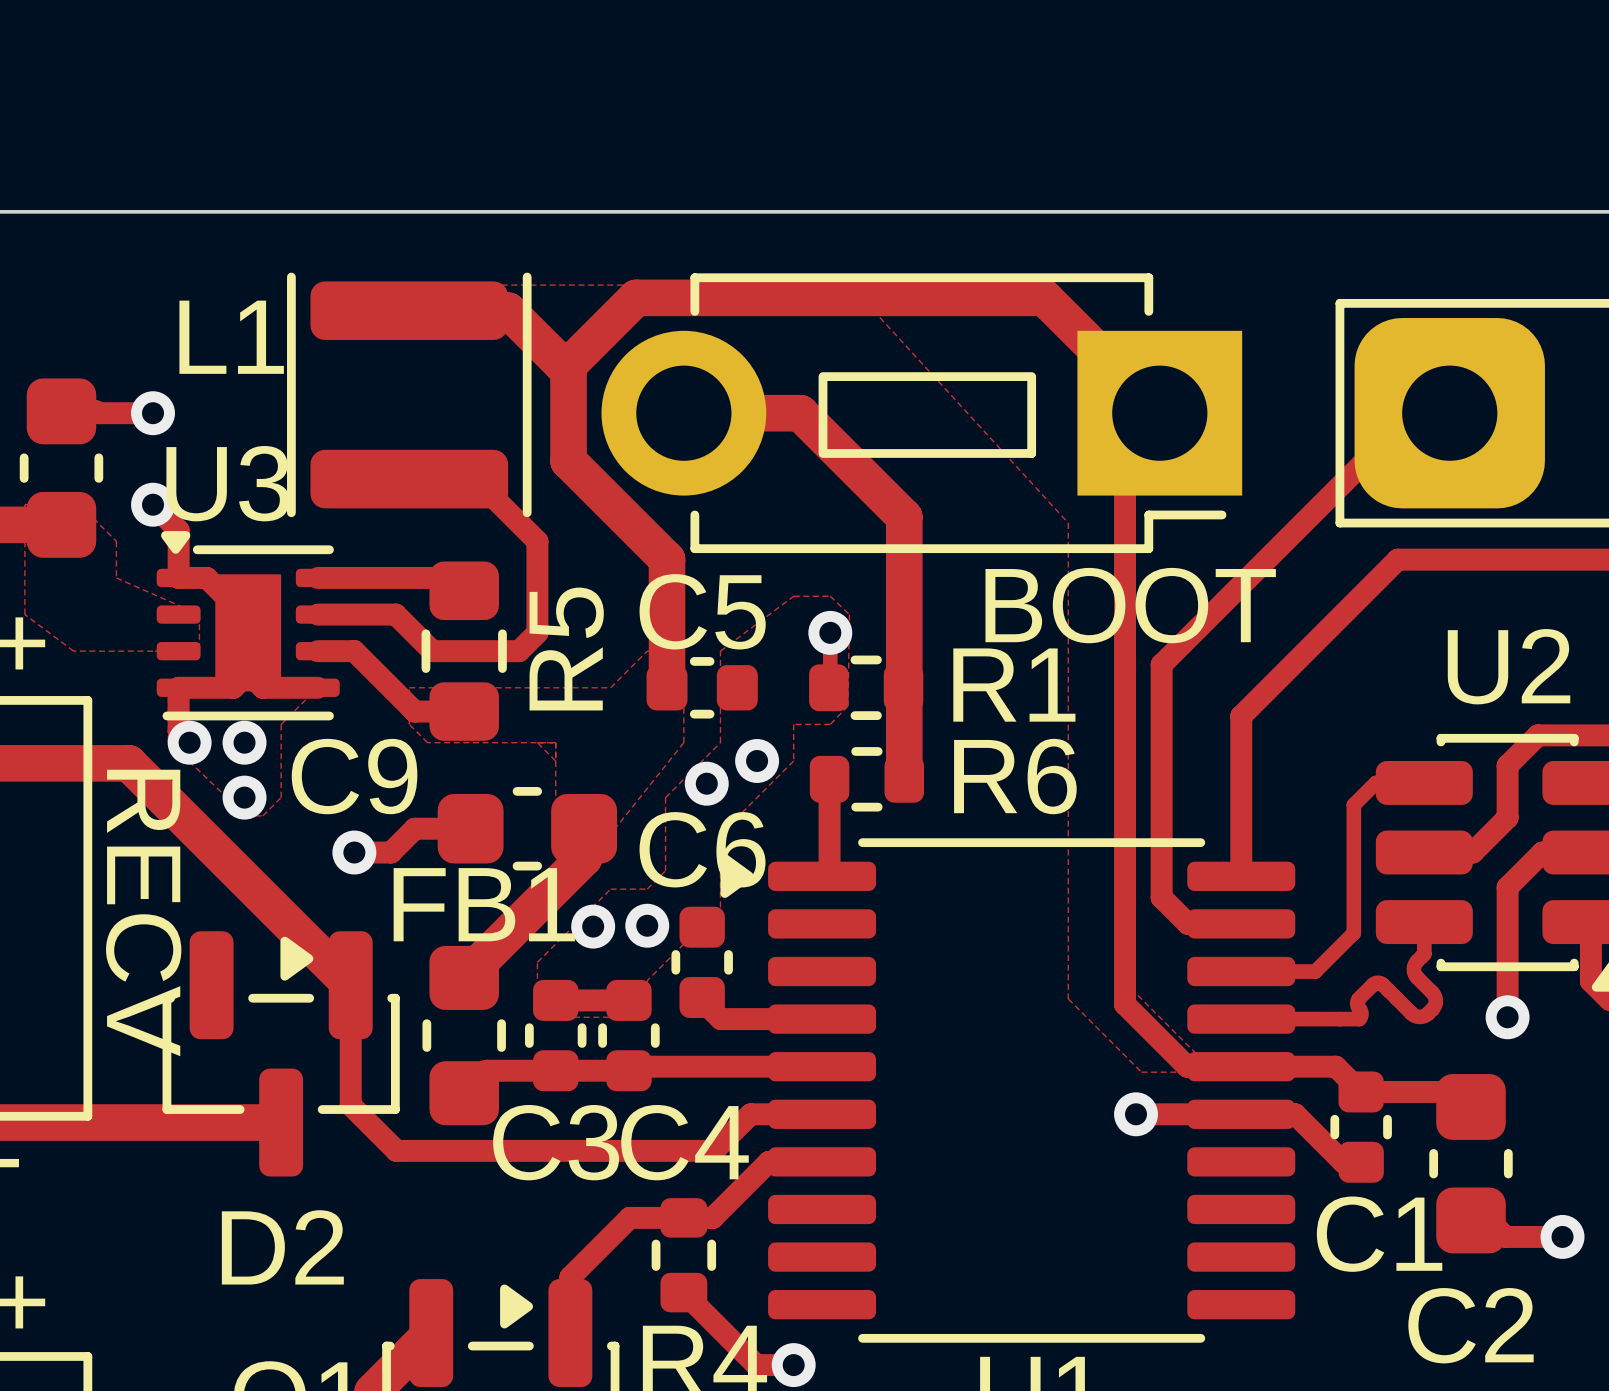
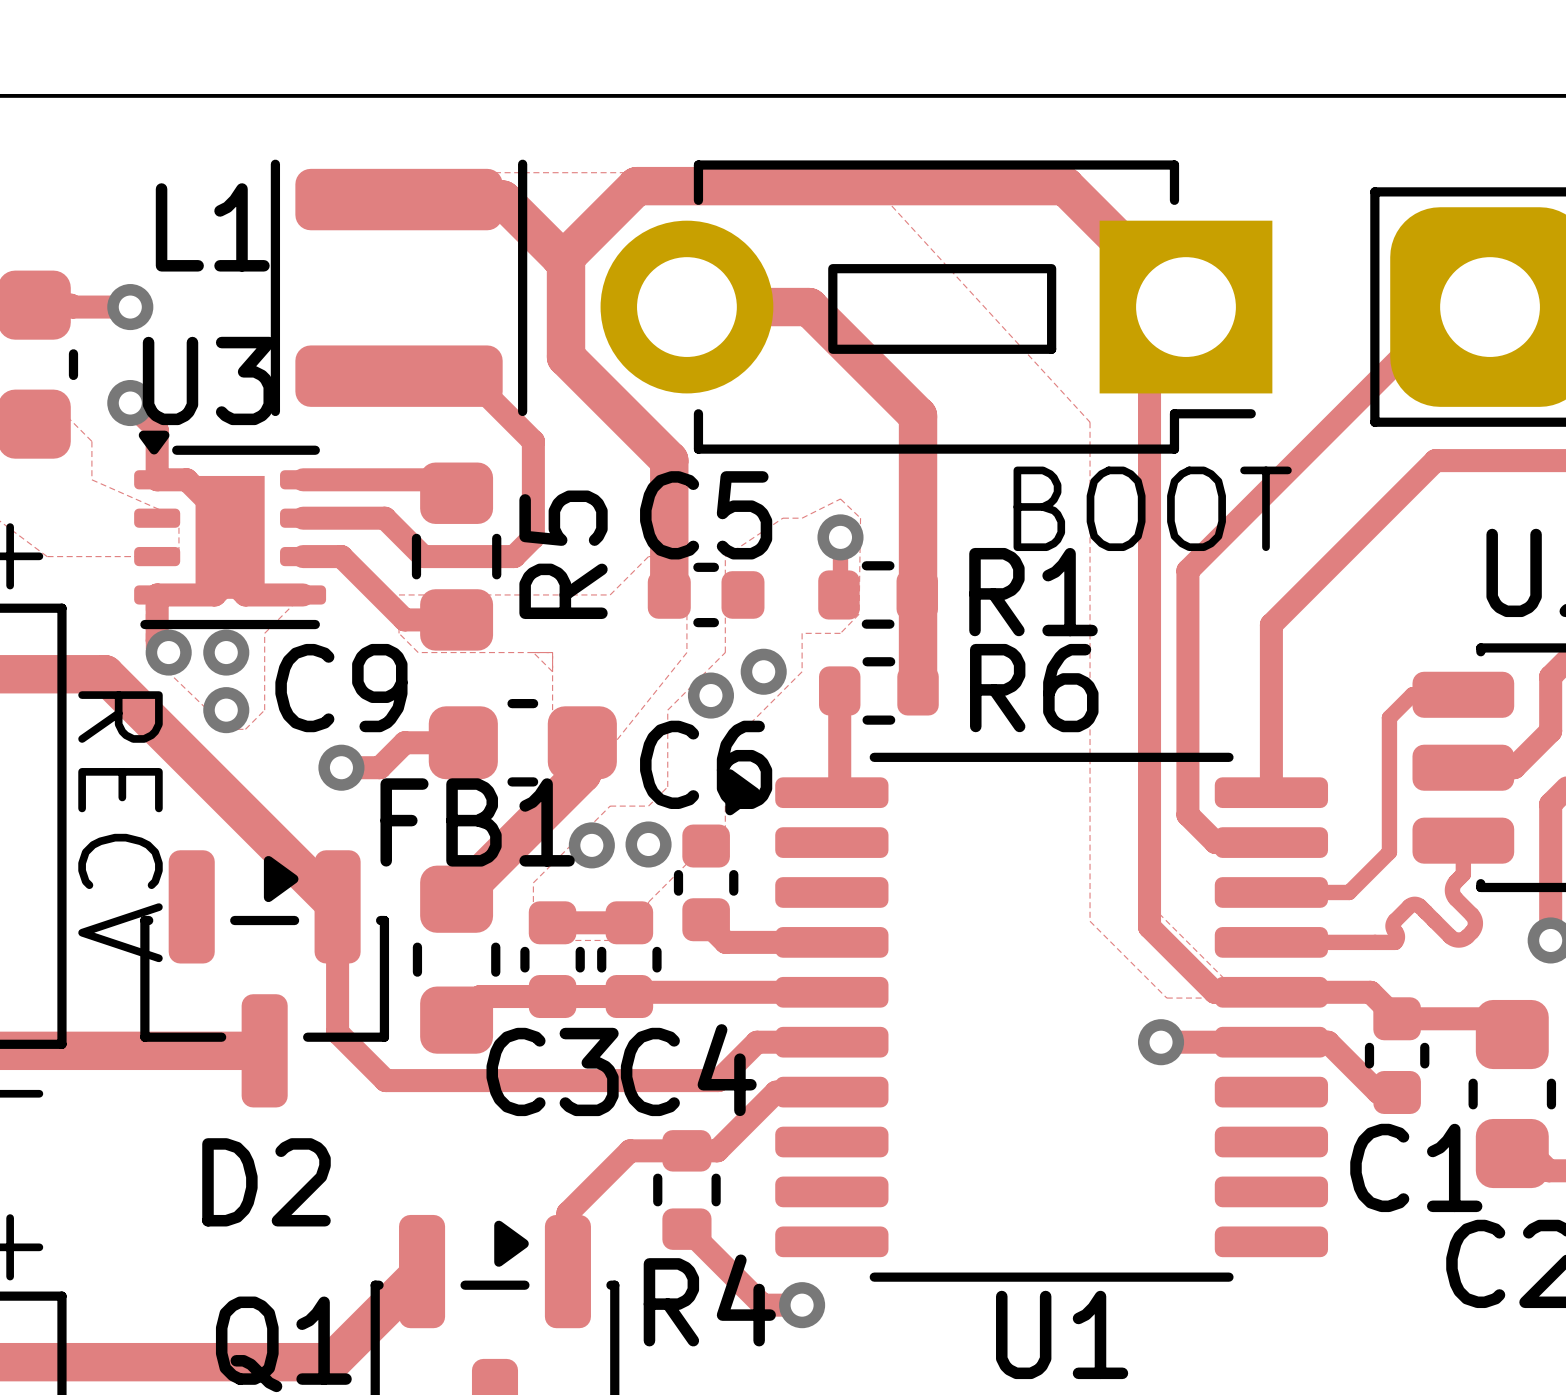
top zone outline: (830, 596) (793, 596) (720, 651) -> (840, 499) (802, 518) (782, 518) (725, 556)

